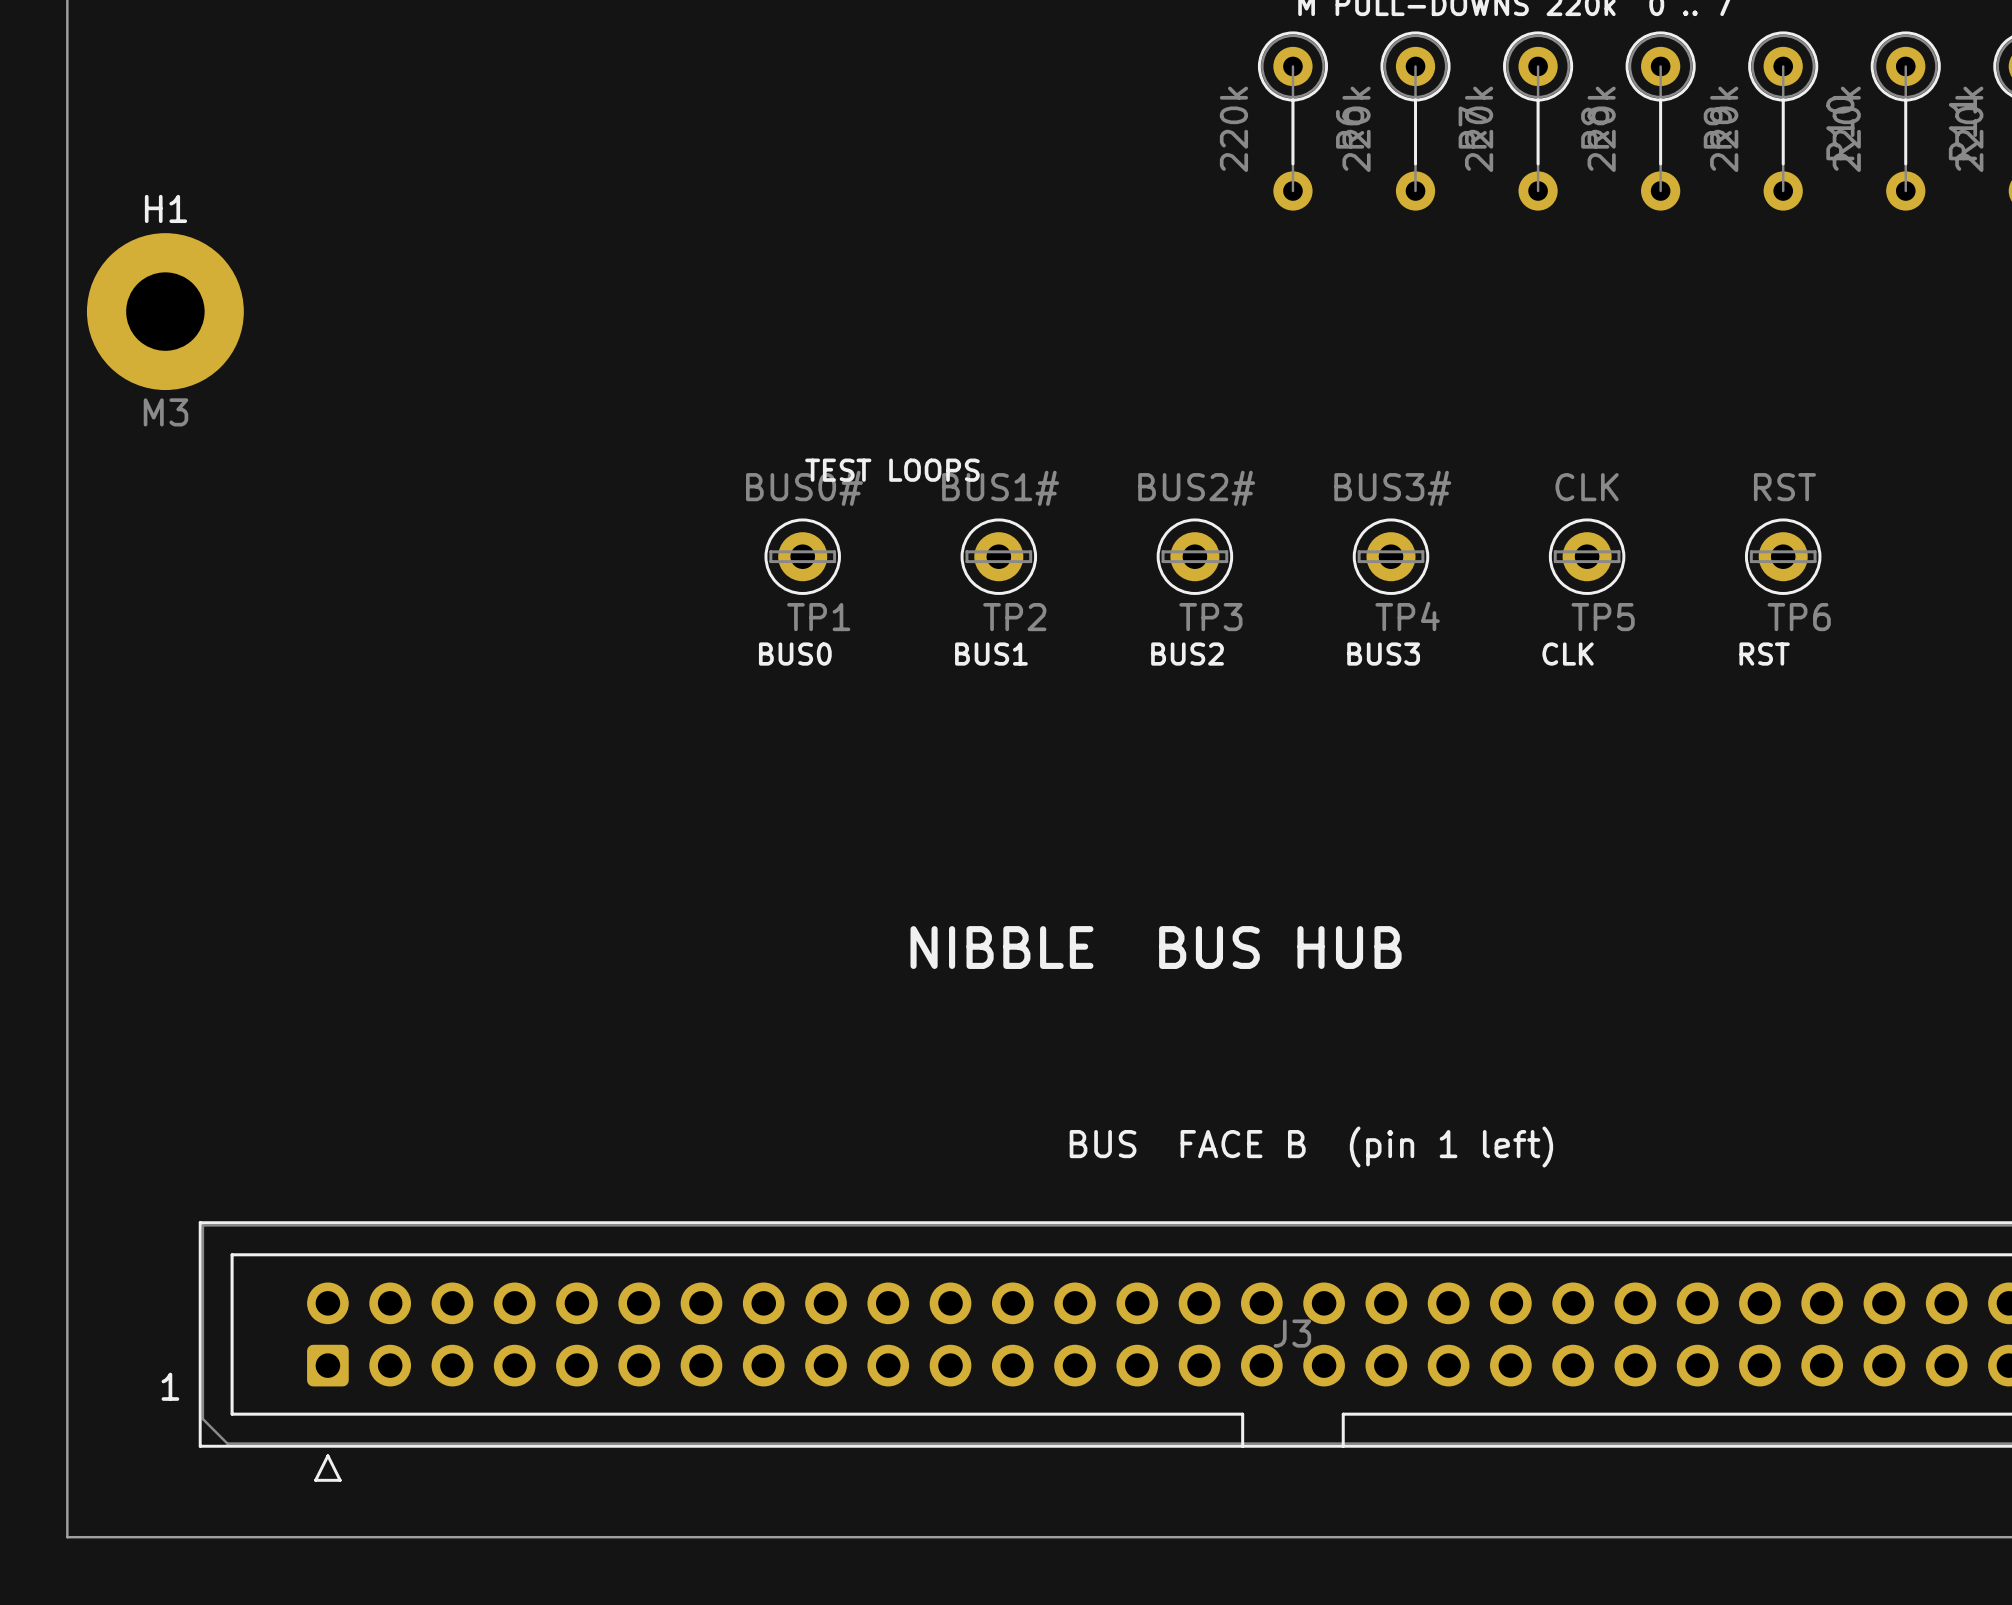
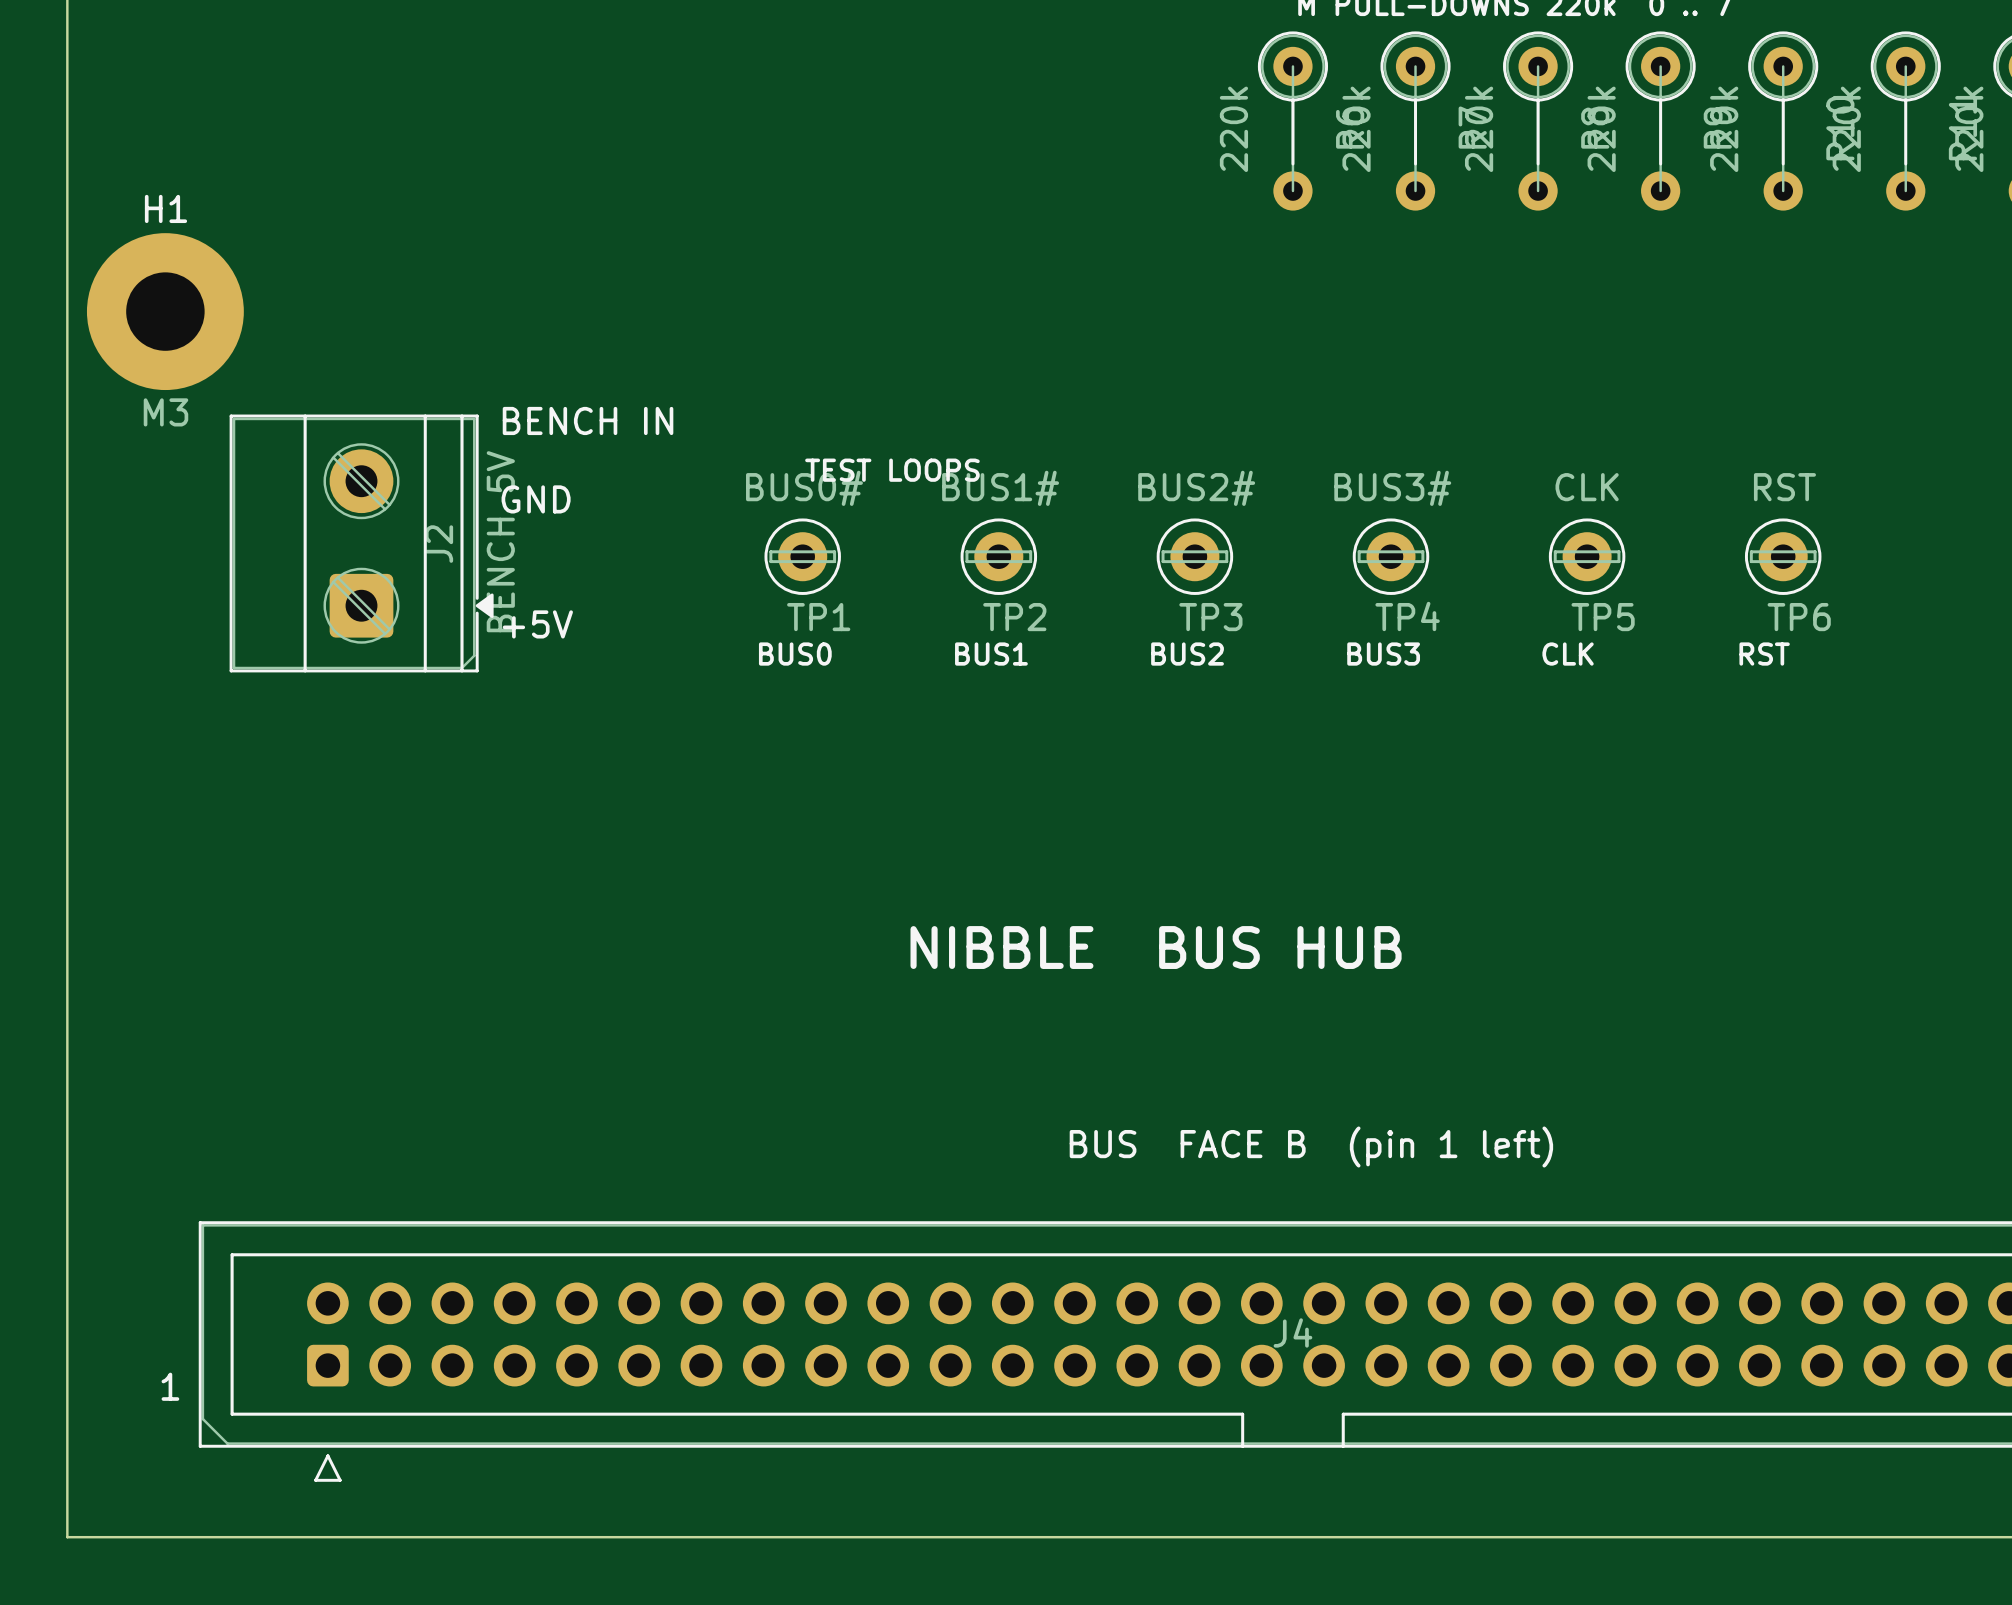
text: none -> BENCH IN (588, 420)
text: none -> GND (536, 499)
J2: none -> BENCH 5V (361, 543)
text: none -> +5V (537, 624)
J3 name: J3 (1292, 1333) -> J4 (1292, 1332)

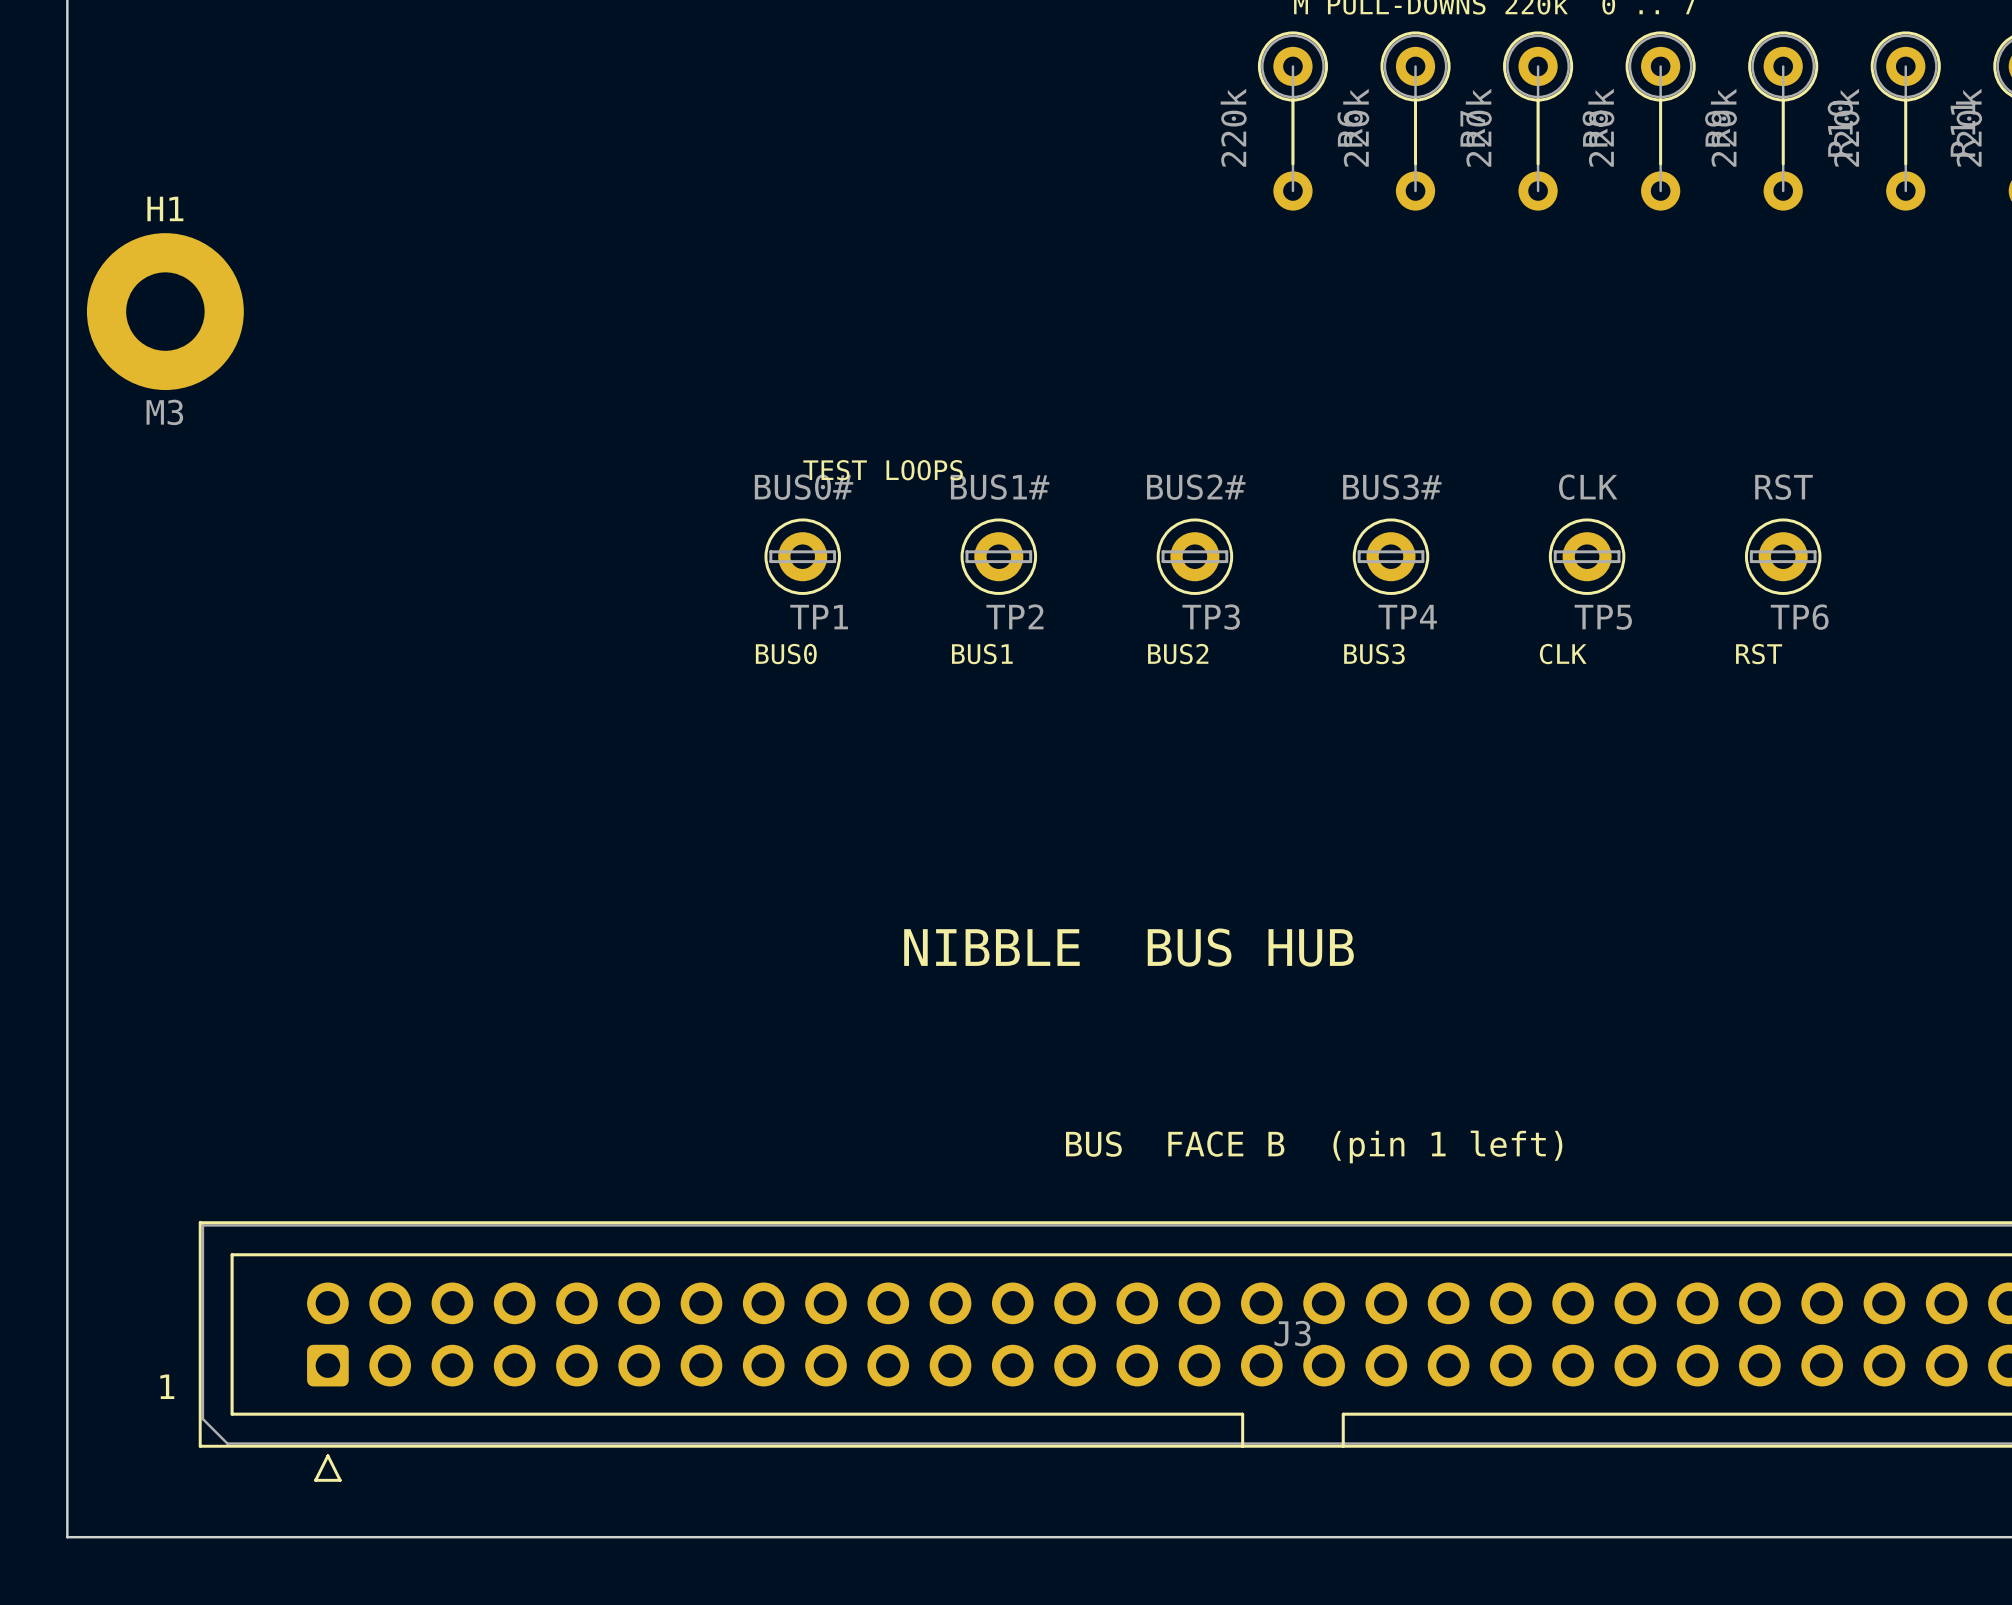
text: BENCH IN (588, 420) -> none
text: GND (536, 499) -> none
J2: BENCH 5V (361, 543) -> none
text: +5V (537, 624) -> none
J4 name: J4 (1292, 1332) -> J3 (1292, 1333)

